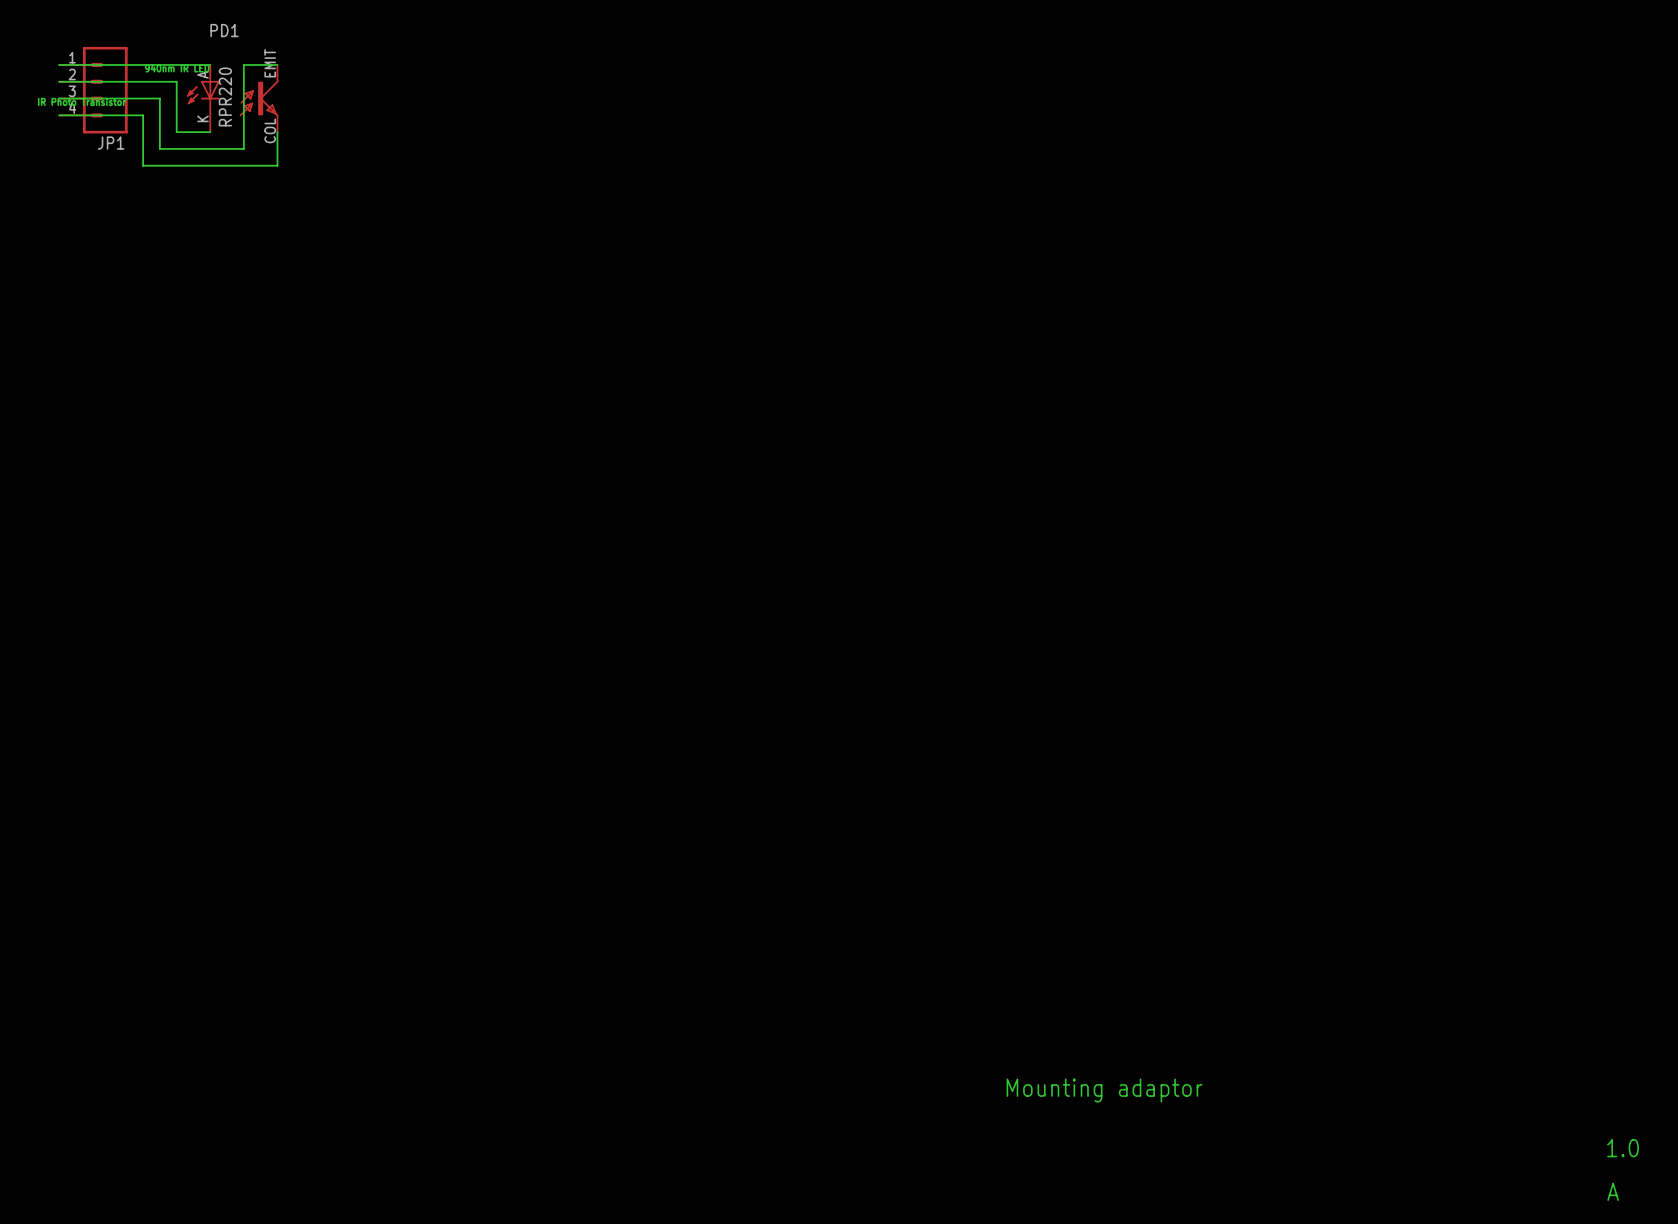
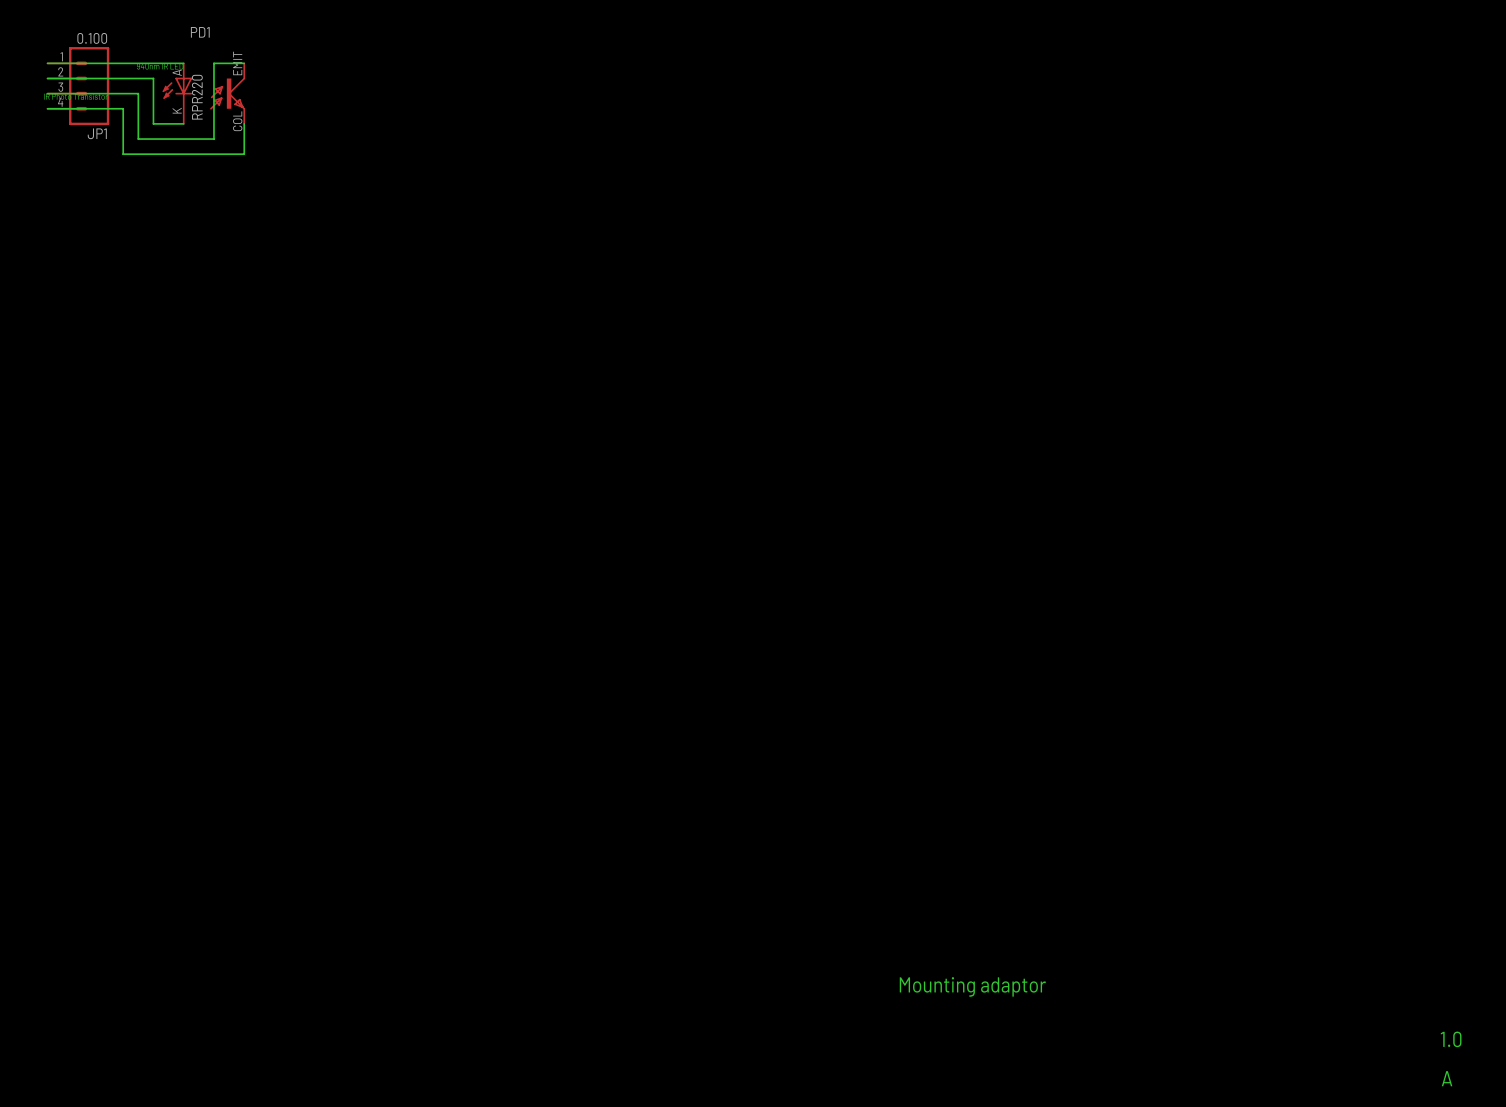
JP1 value: none -> 0.100 (92, 38)

